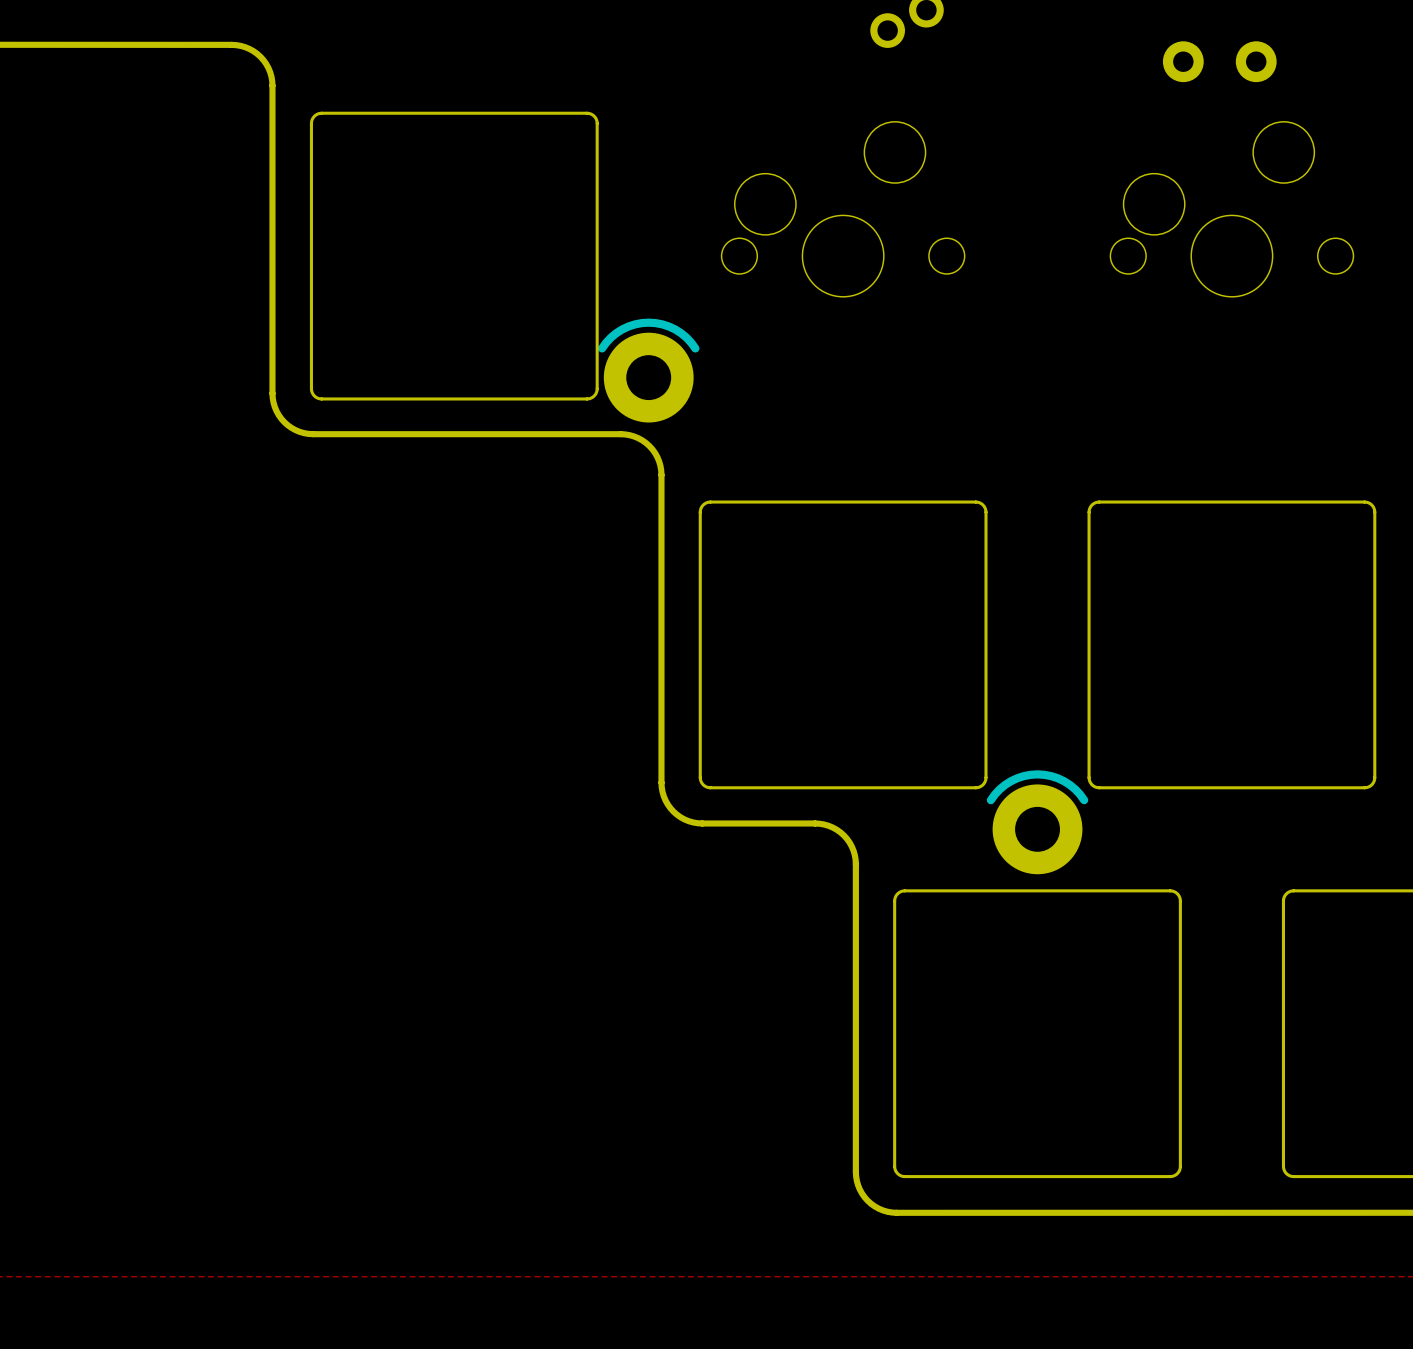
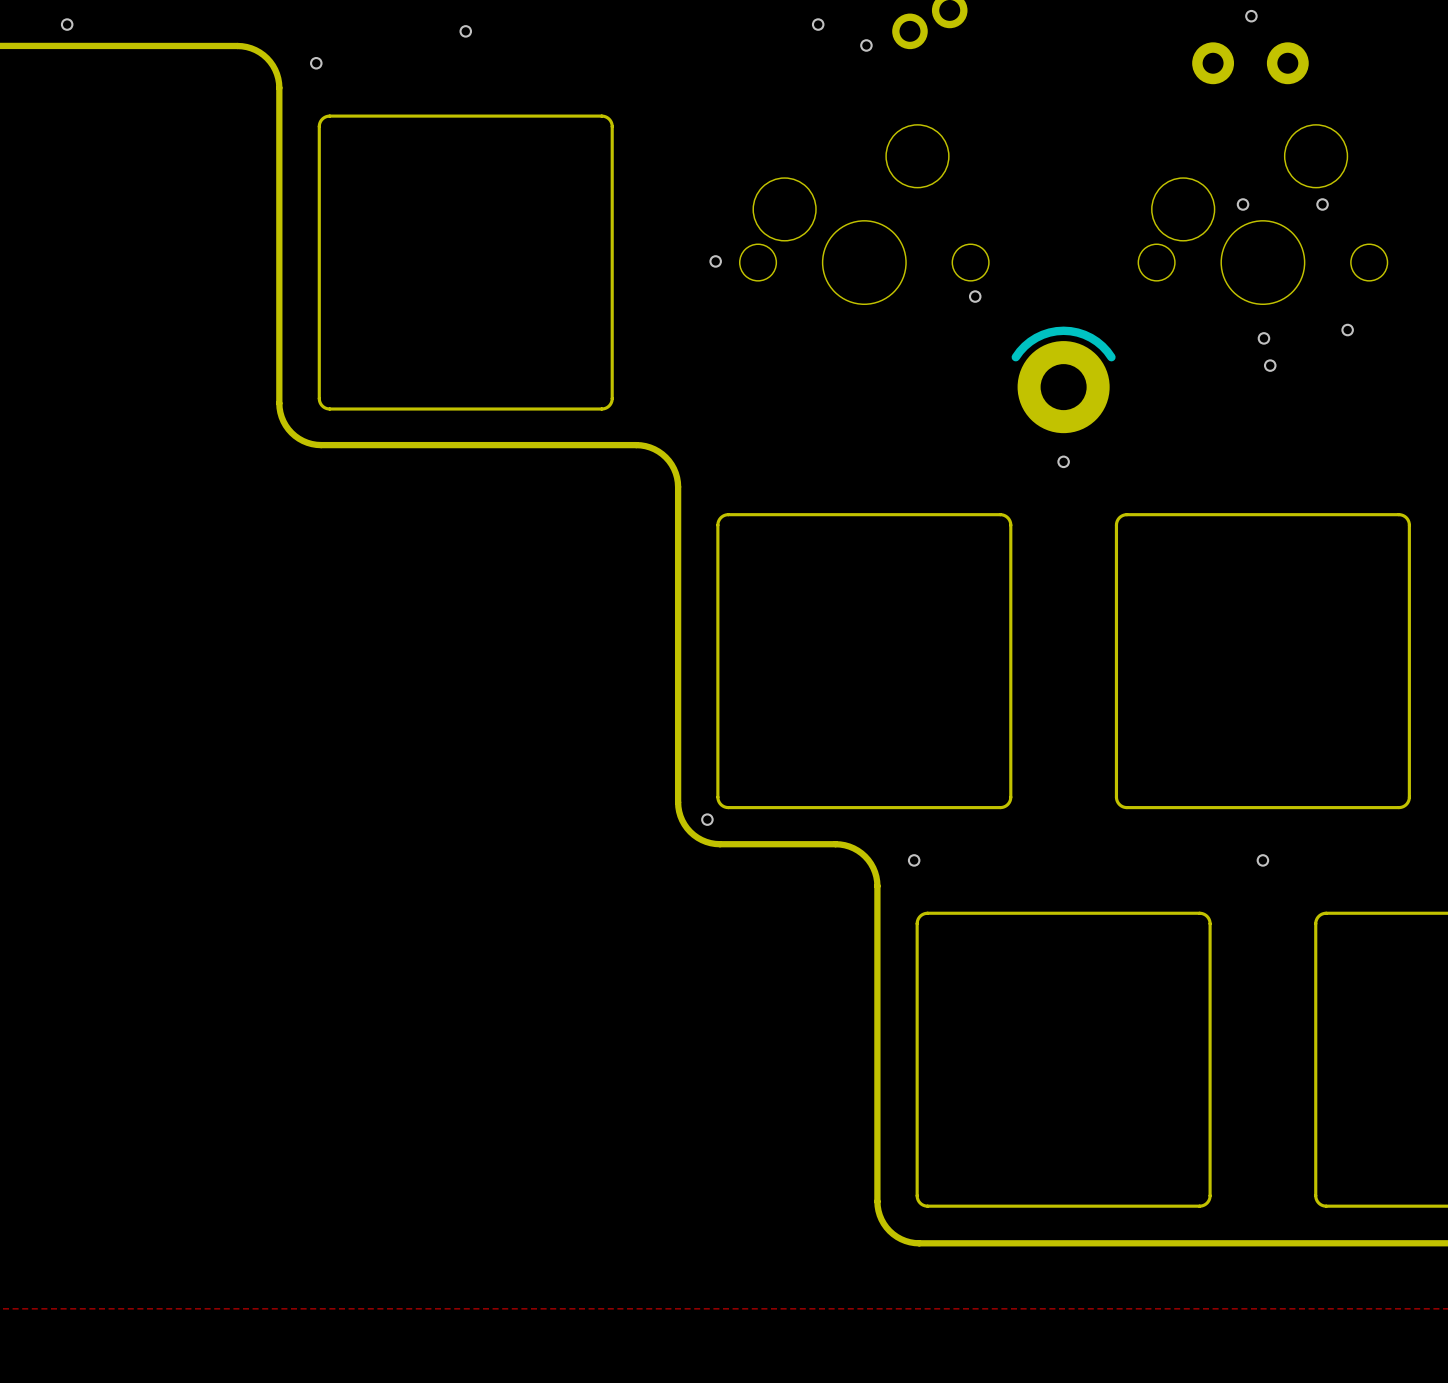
via: none -> (1251, 16)
via: none -> (67, 24)
via: none -> (818, 24)
via: none -> (465, 31)
via: none -> (866, 45)
via: none -> (316, 63)
via: none -> (1243, 204)
via: none -> (1322, 204)
via: none -> (715, 261)
via: none -> (975, 296)
via: none -> (1347, 330)
via: none -> (1263, 338)
via: none -> (1270, 365)
part: (648, 370) -> none
part: none -> (1063, 379)
via: none -> (1063, 461)
via: none -> (707, 819)
part: (1037, 822) -> none
via: none -> (914, 860)
via: none -> (1262, 860)

